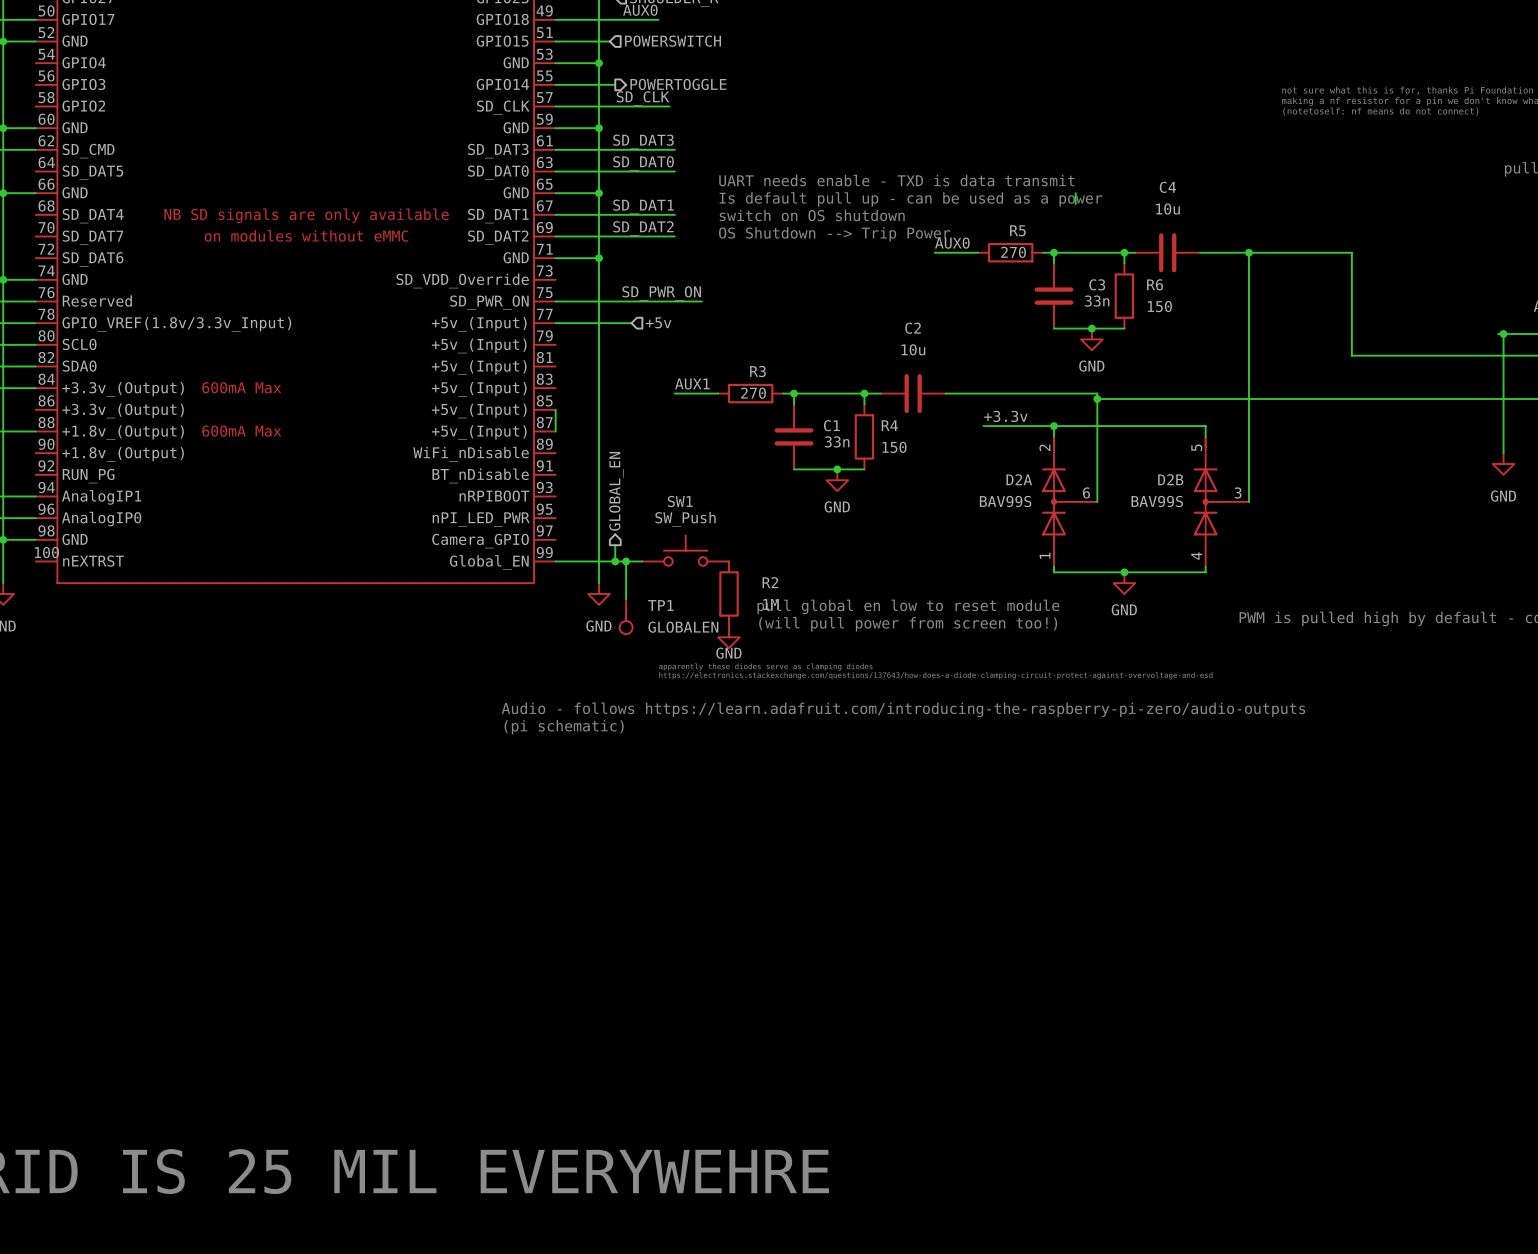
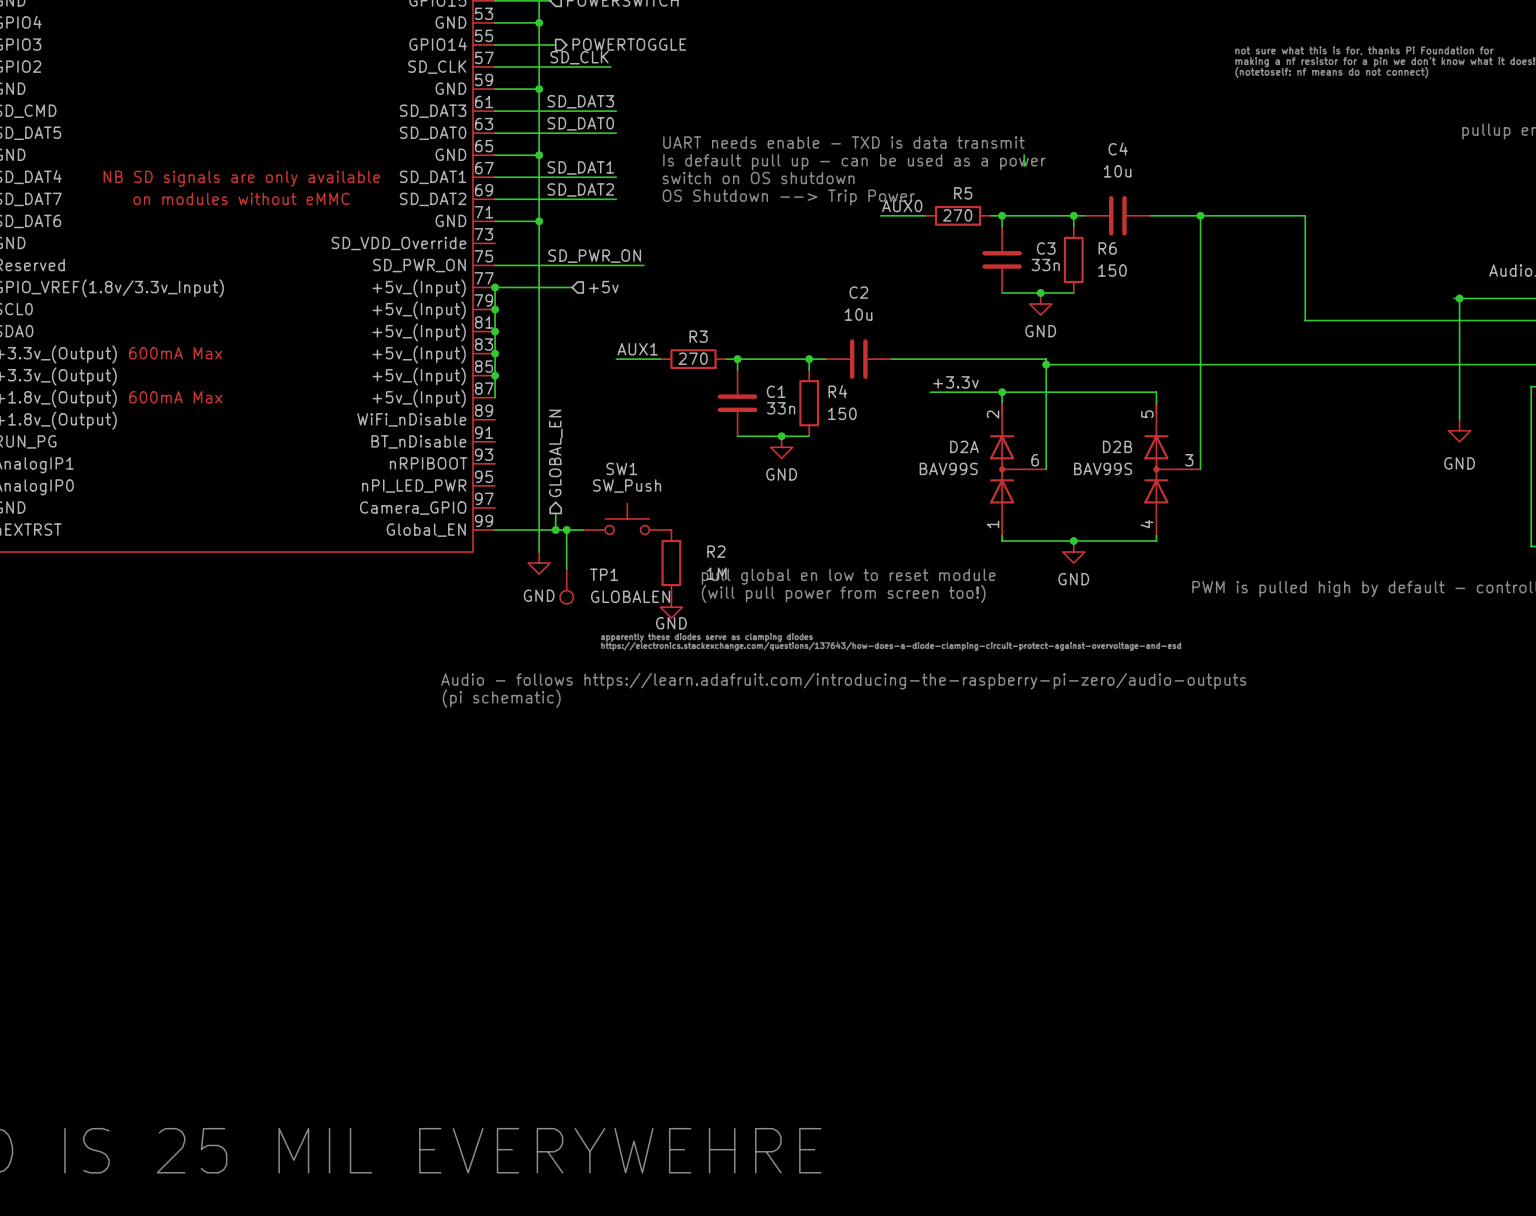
wire: none -> (495, 287) (495, 375)
junction: none -> (495, 287)
junction: none -> (495, 309)
junction: none -> (495, 331)
junction: none -> (495, 353)
junction: none -> (495, 375)

